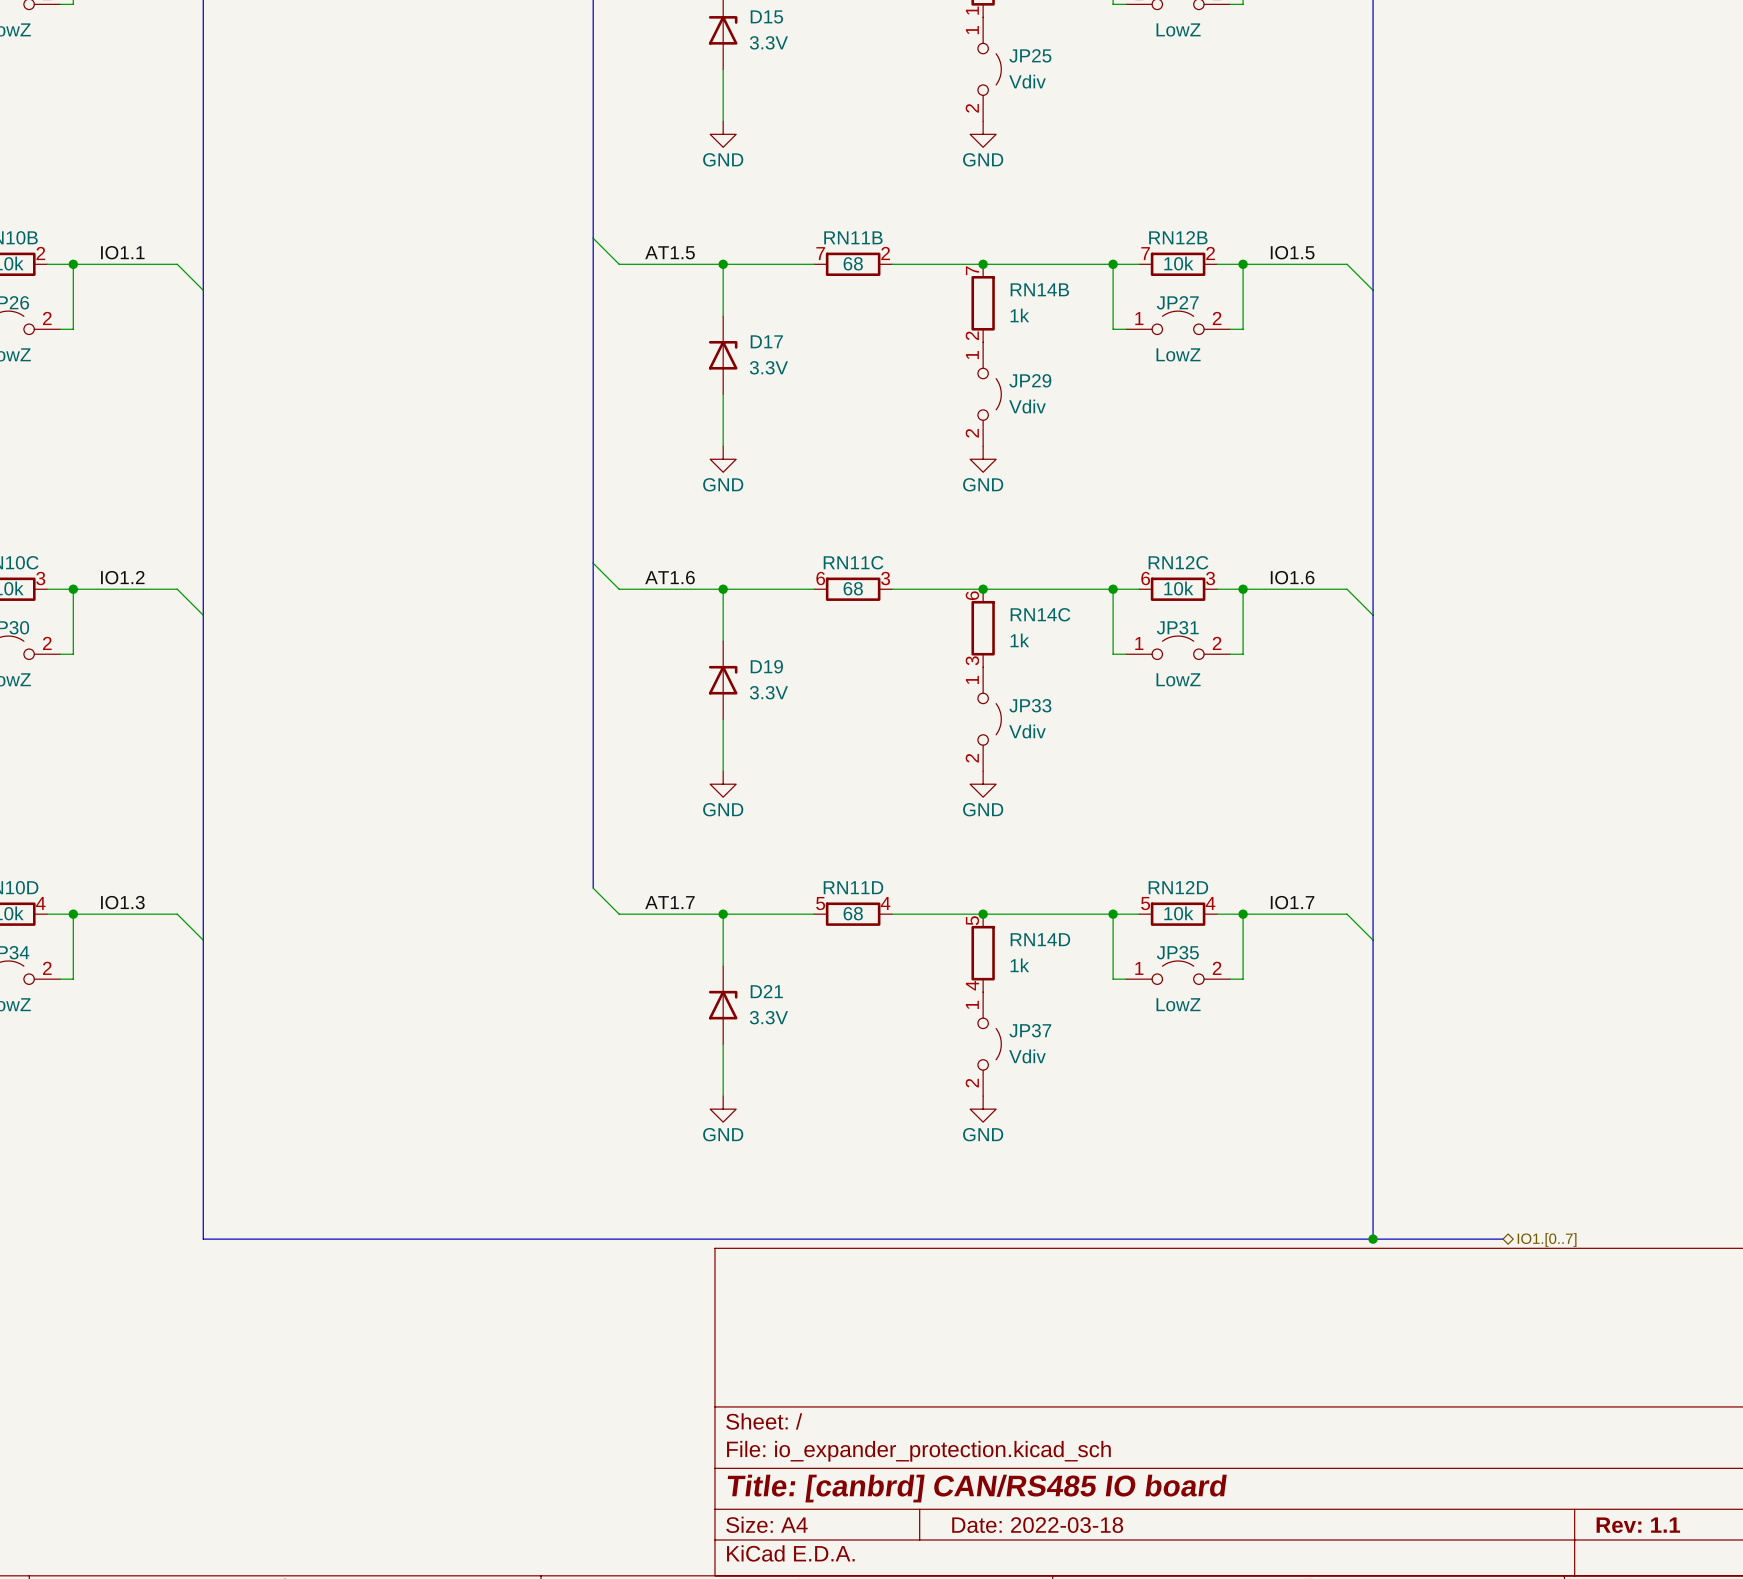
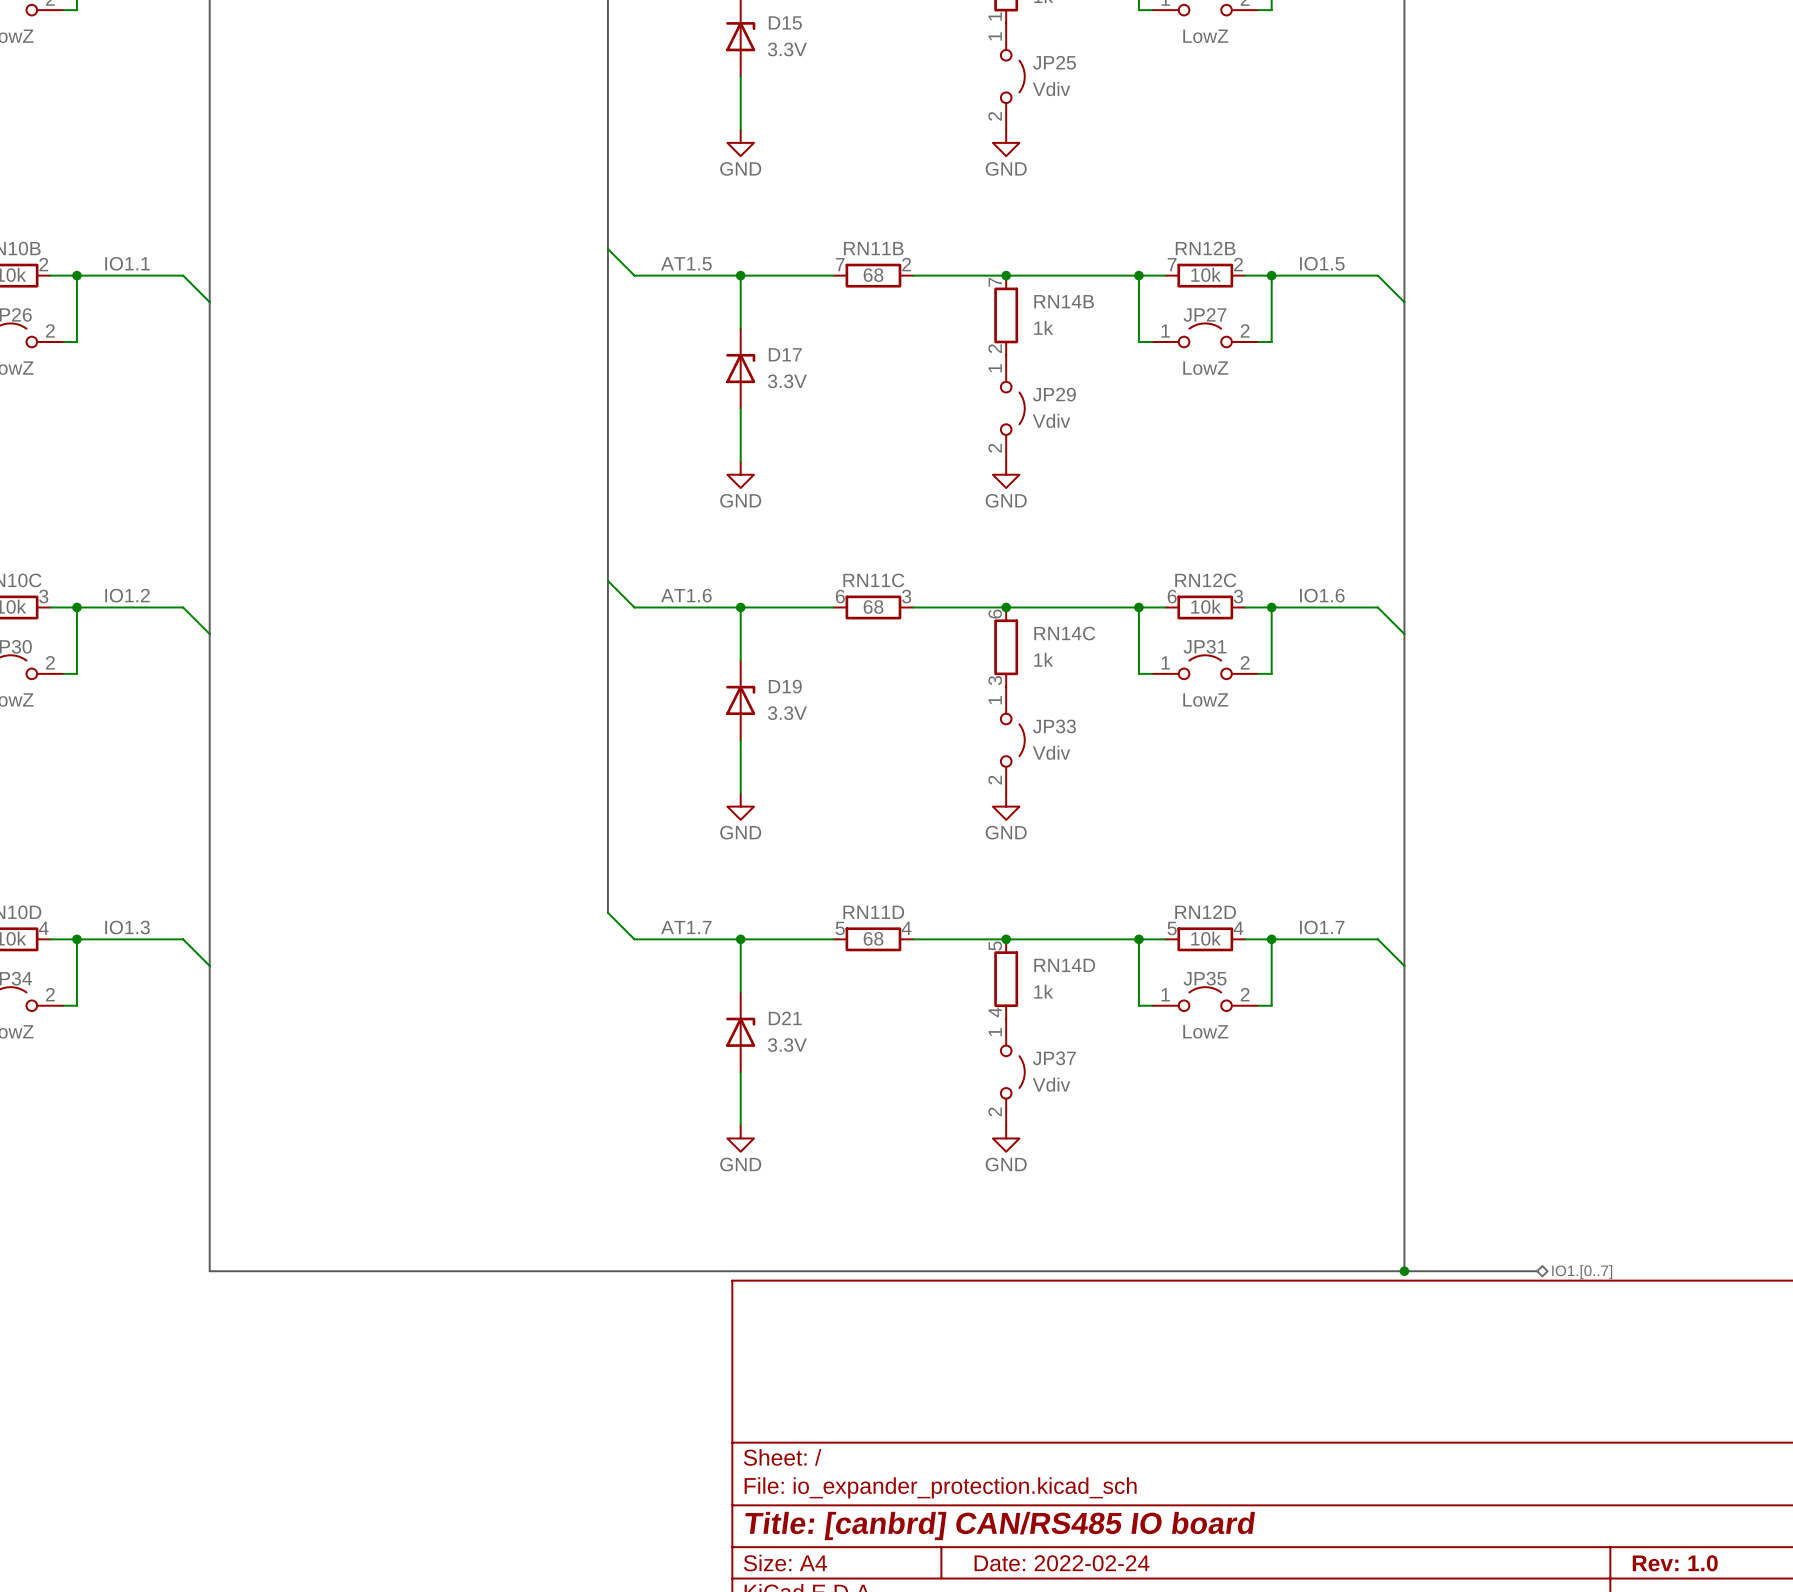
title block: Date: 2022-03-18 (1037, 1525) -> Date: 2022-02-24 (1062, 1563)
title block: Rev: 1.1 (1638, 1525) -> Rev: 1.0 (1675, 1563)

